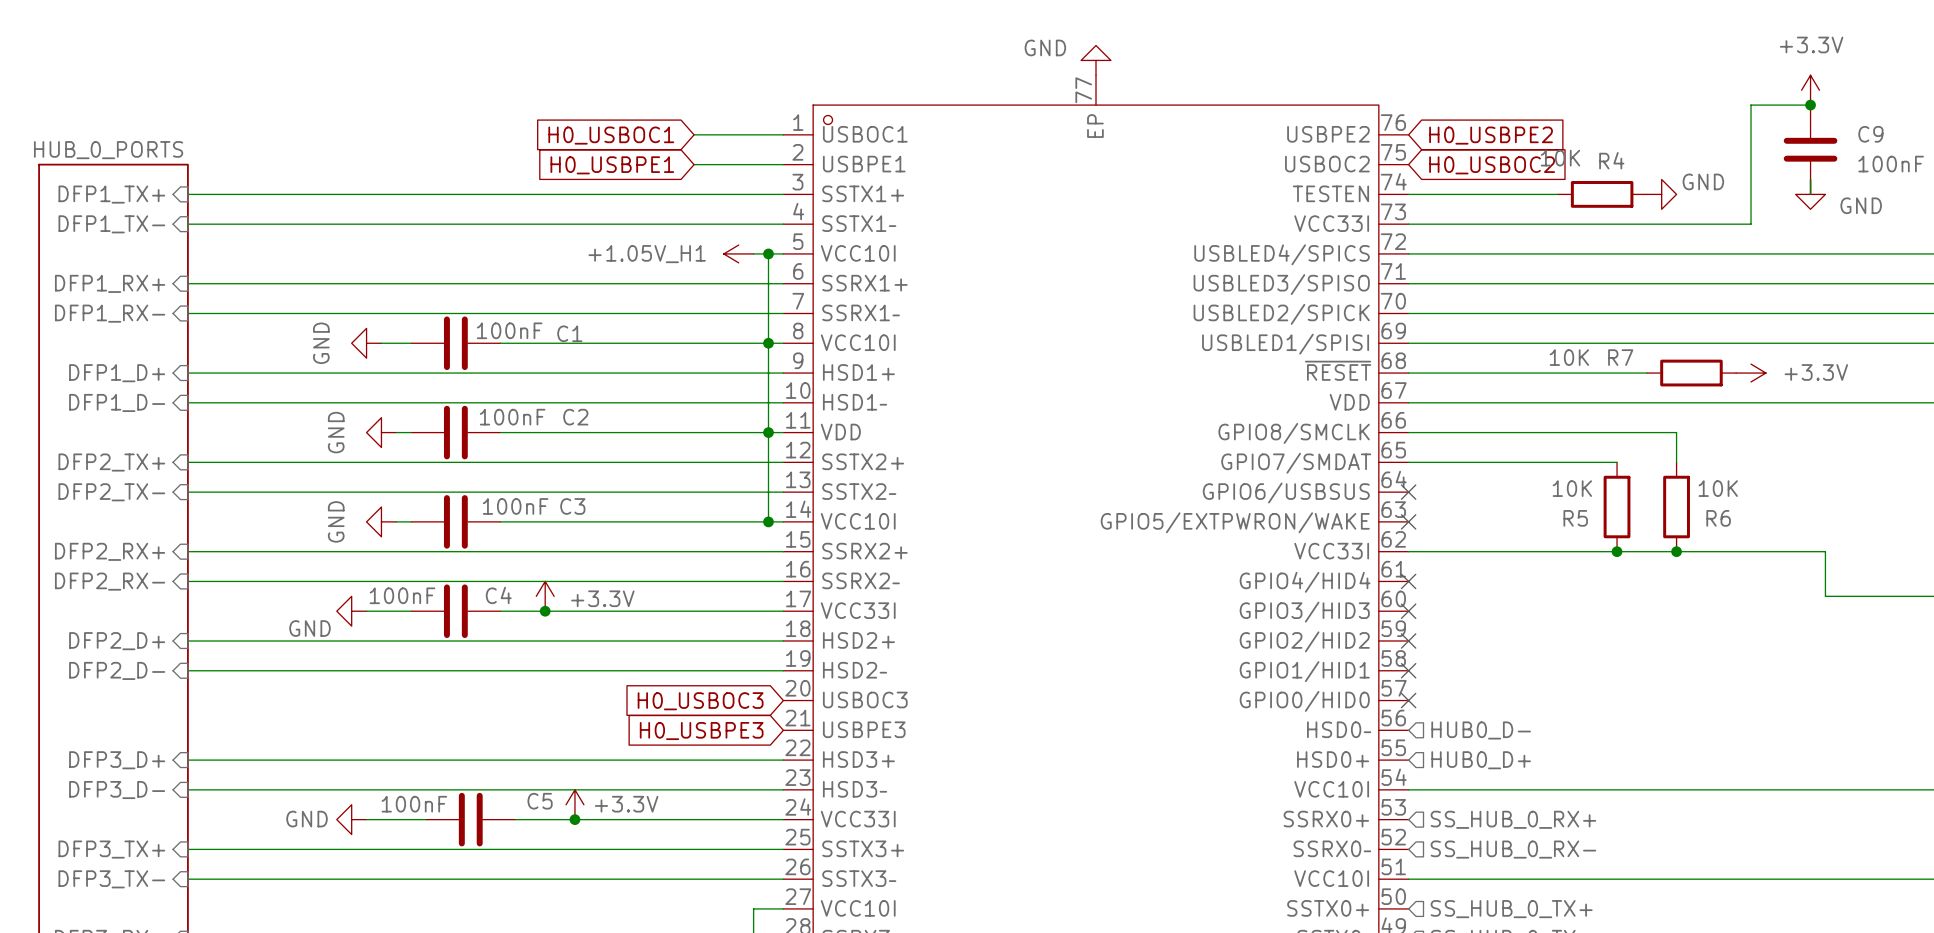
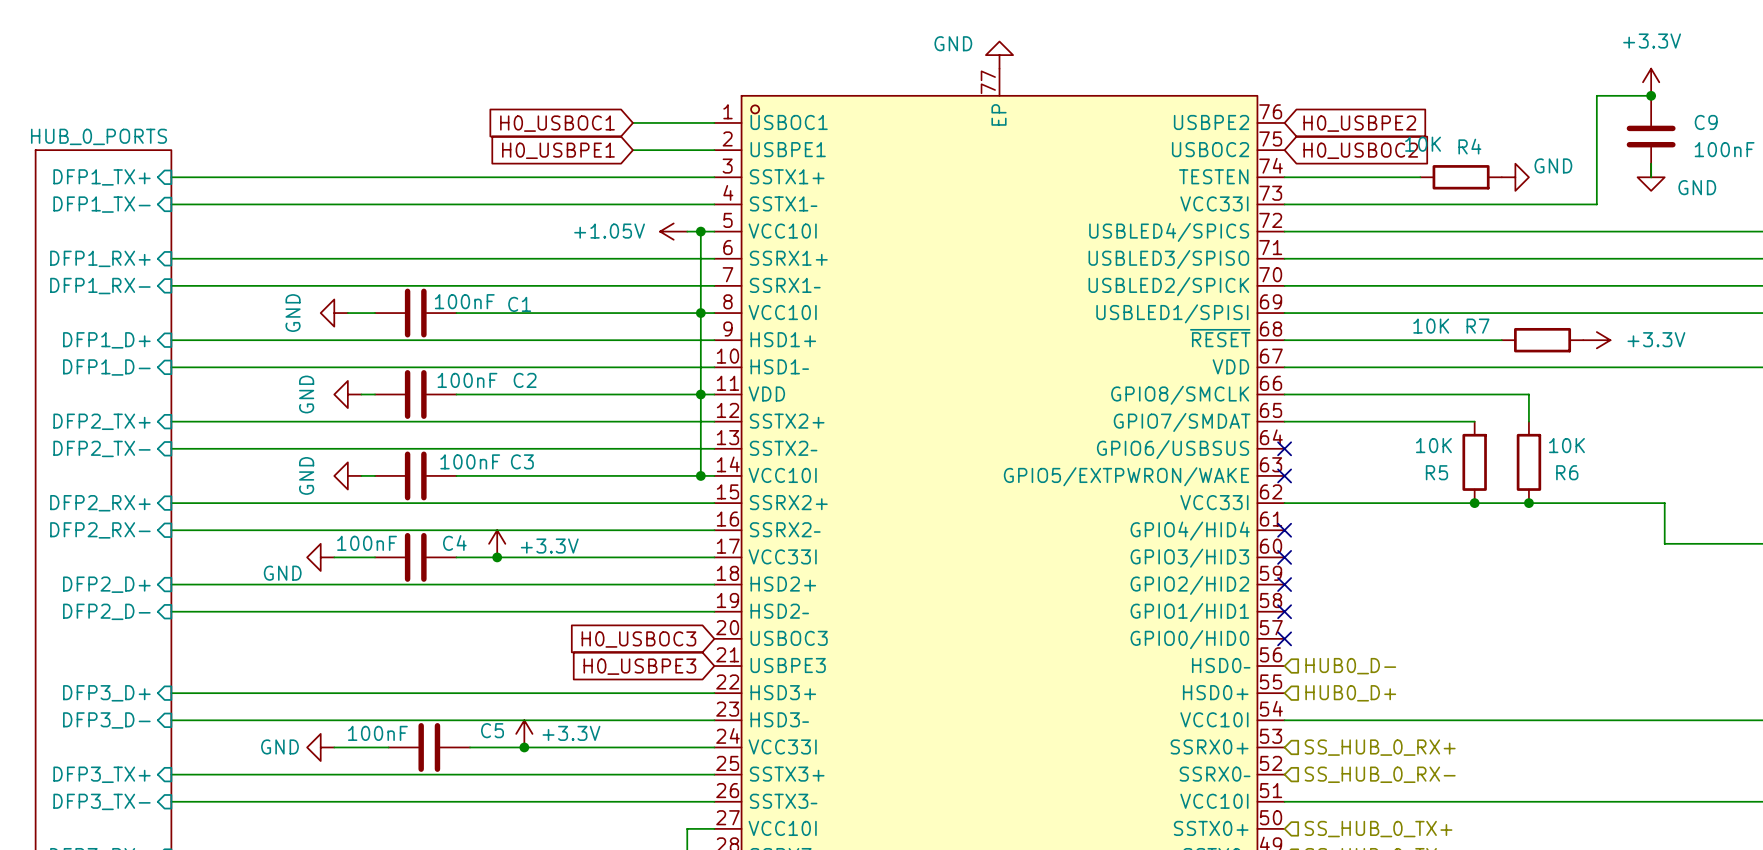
power symbol: +1.05V_H1 (738, 253) -> +1.05V (673, 231)

